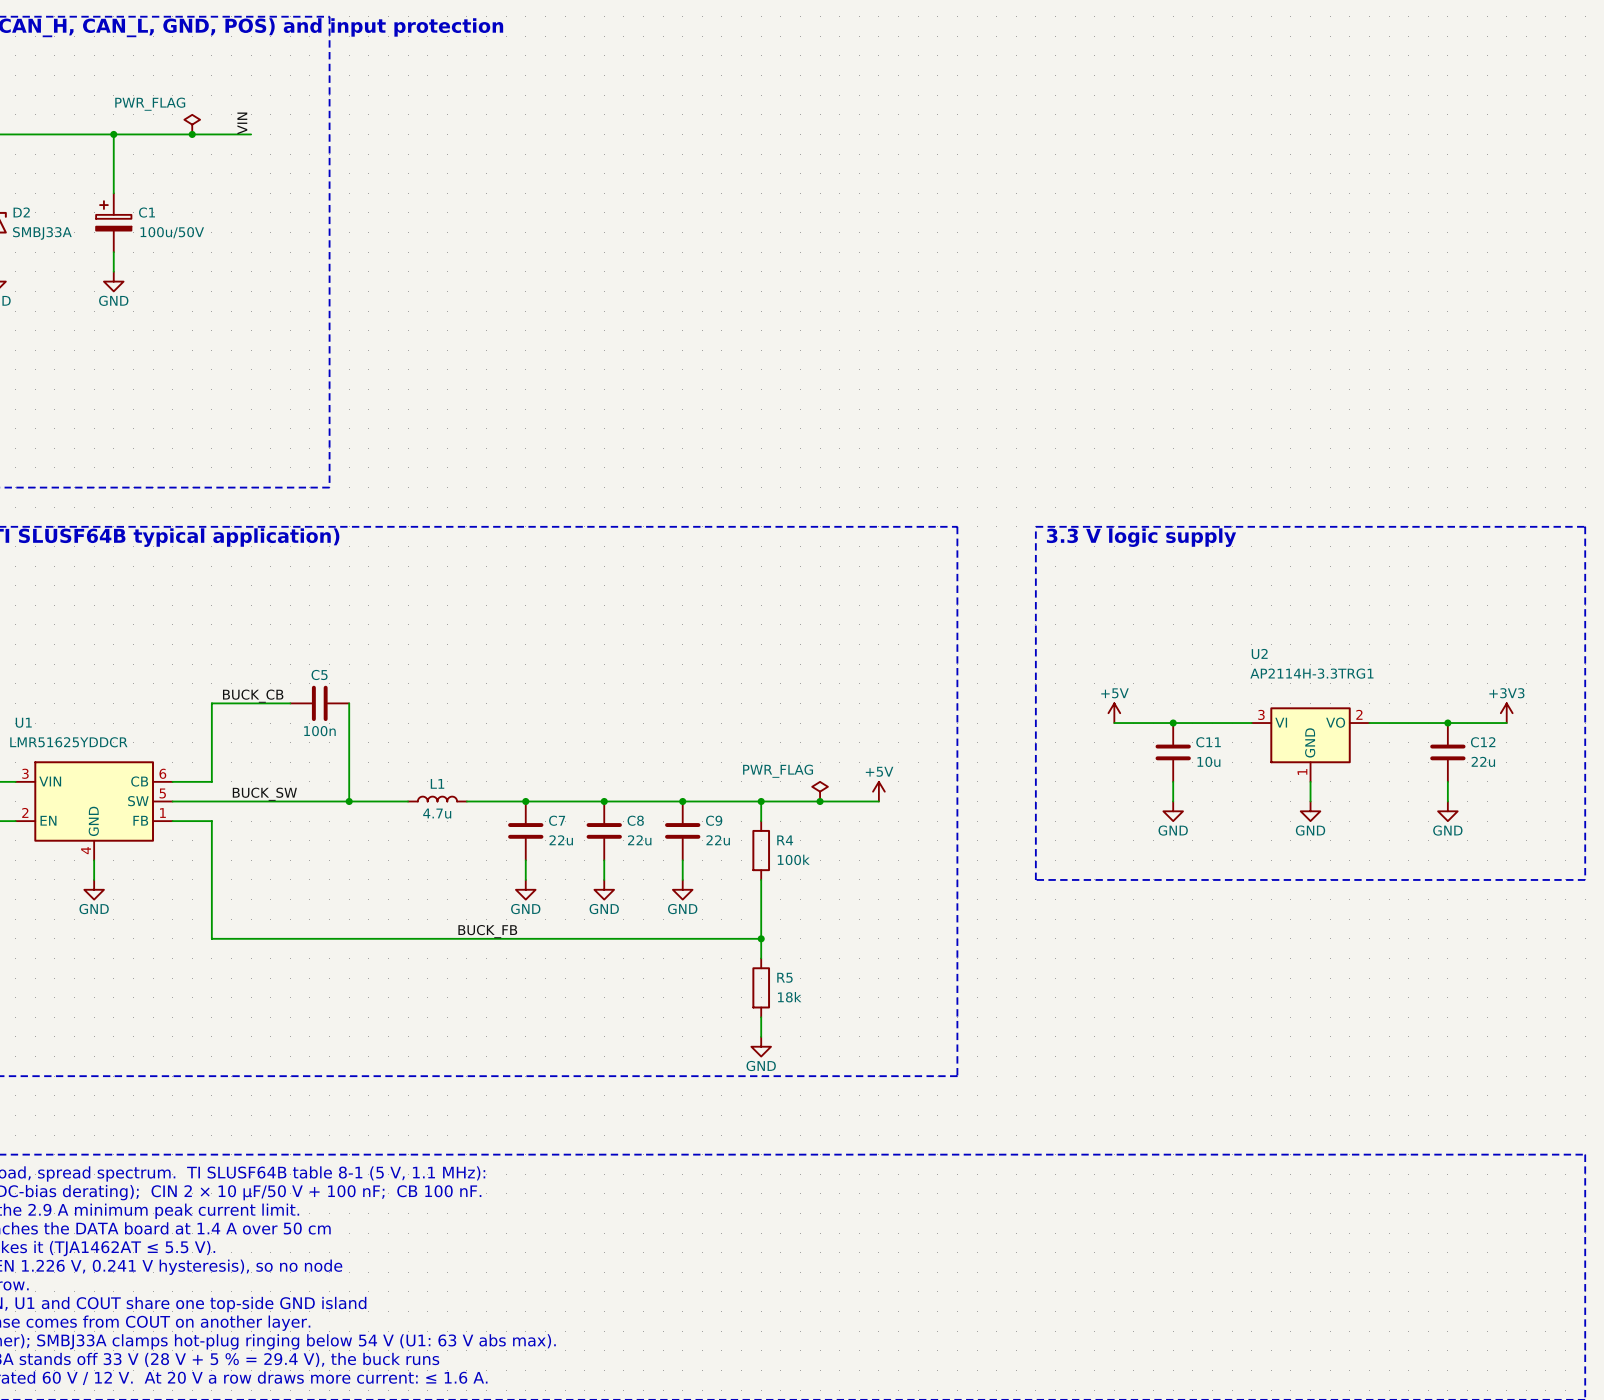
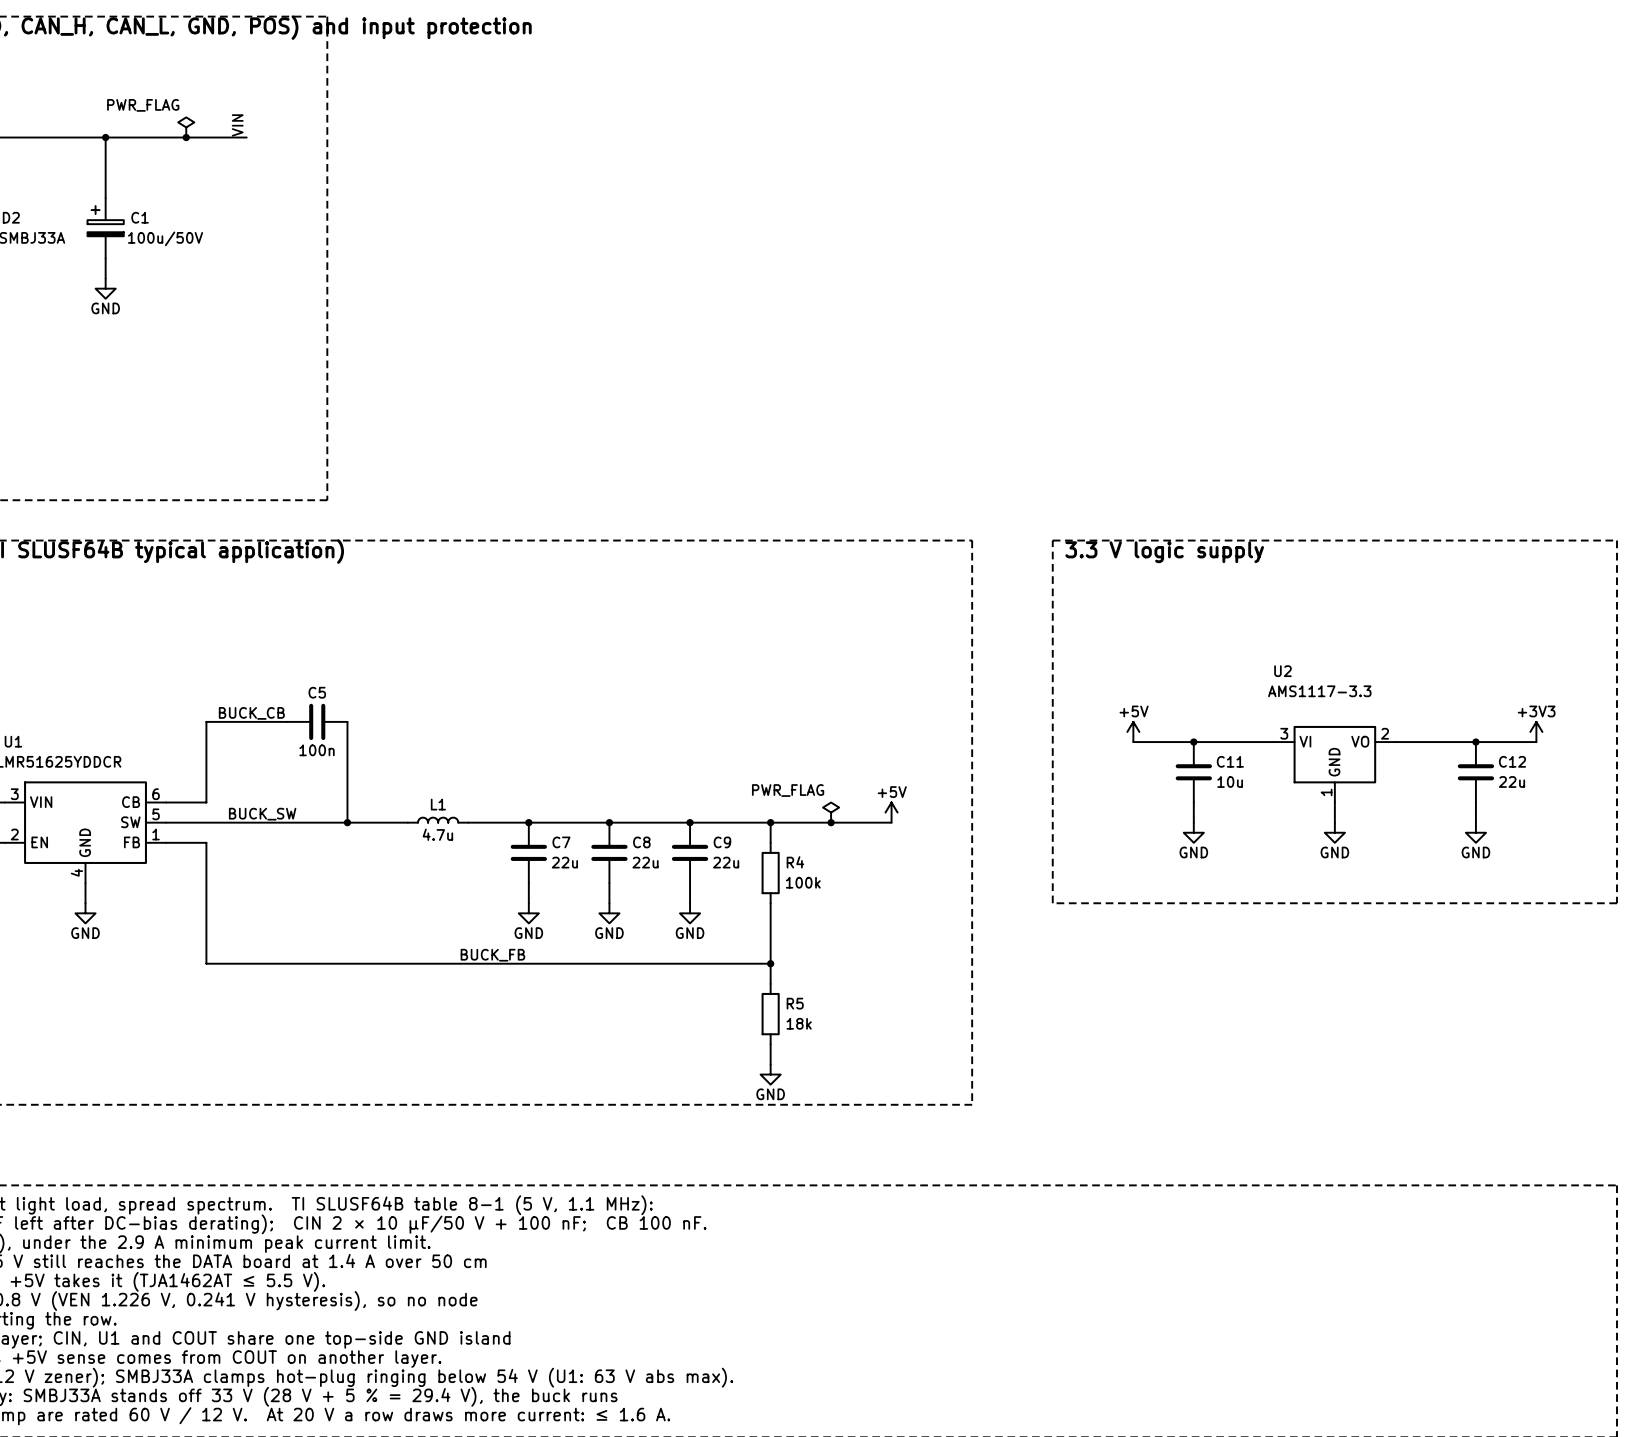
U2 value: AP2114H-3.3TRG1 (1311, 673) -> AMS1117-3.3 (1319, 691)

